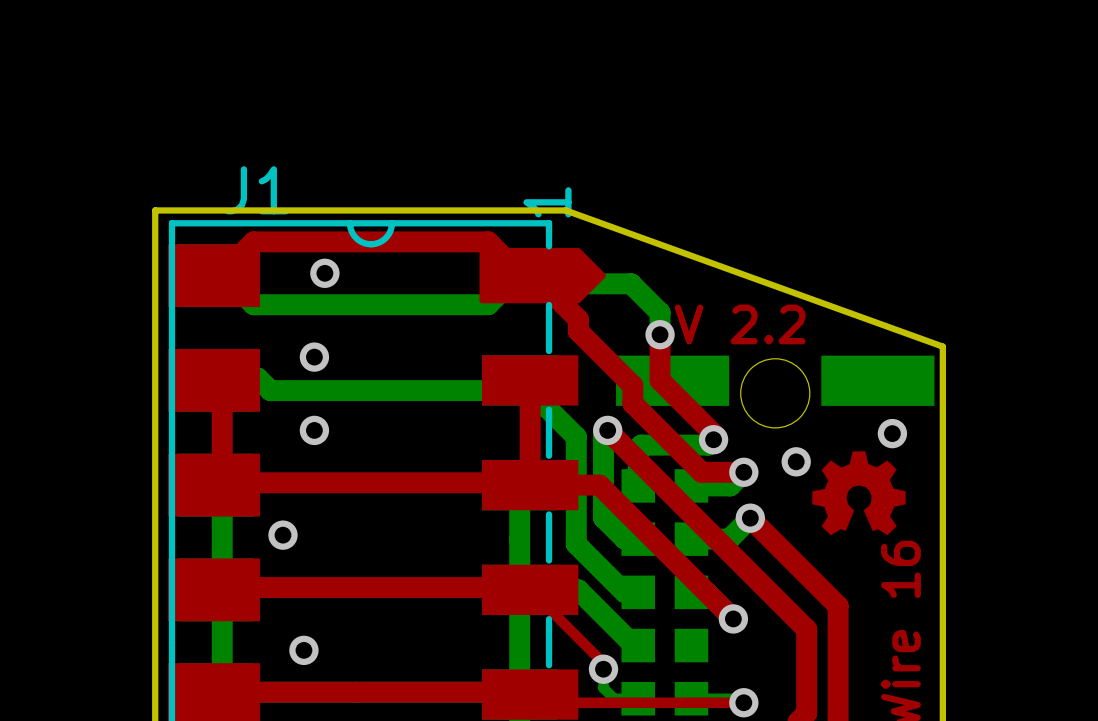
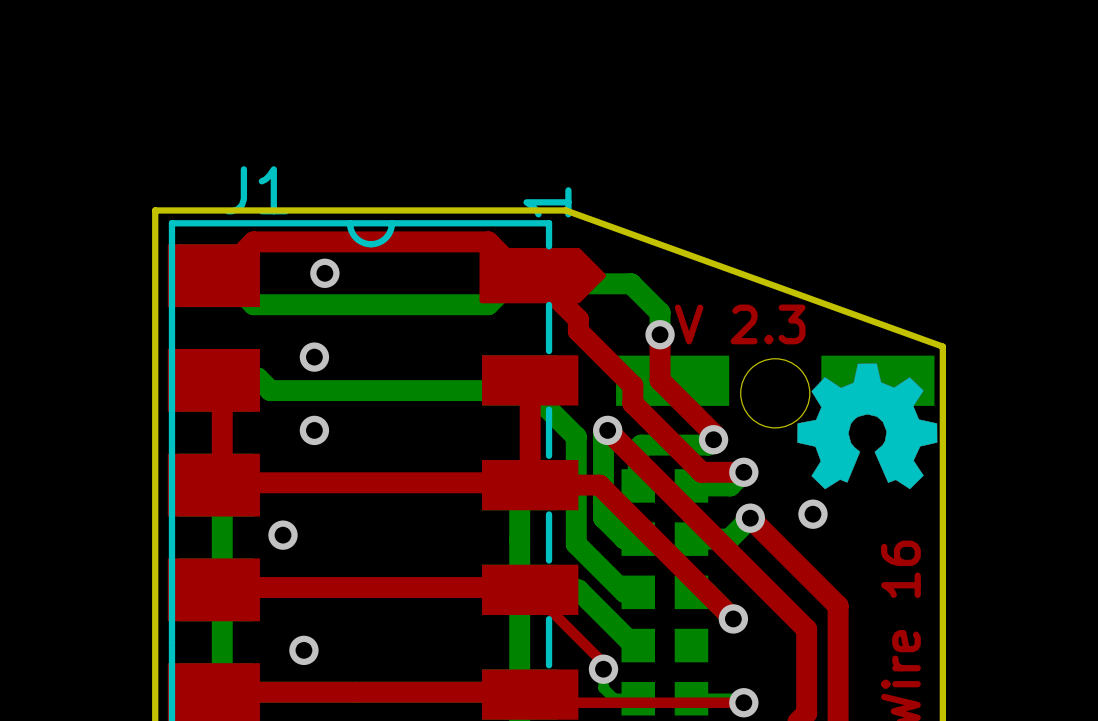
text: V 2.2 (740, 324) -> V 2.3 (740, 324)
drawing: none -> [797, 363, 938, 490]
via: (892, 433) -> none
drawing: [812, 451, 906, 536] -> none
via position: (796, 461) -> (812, 514)

